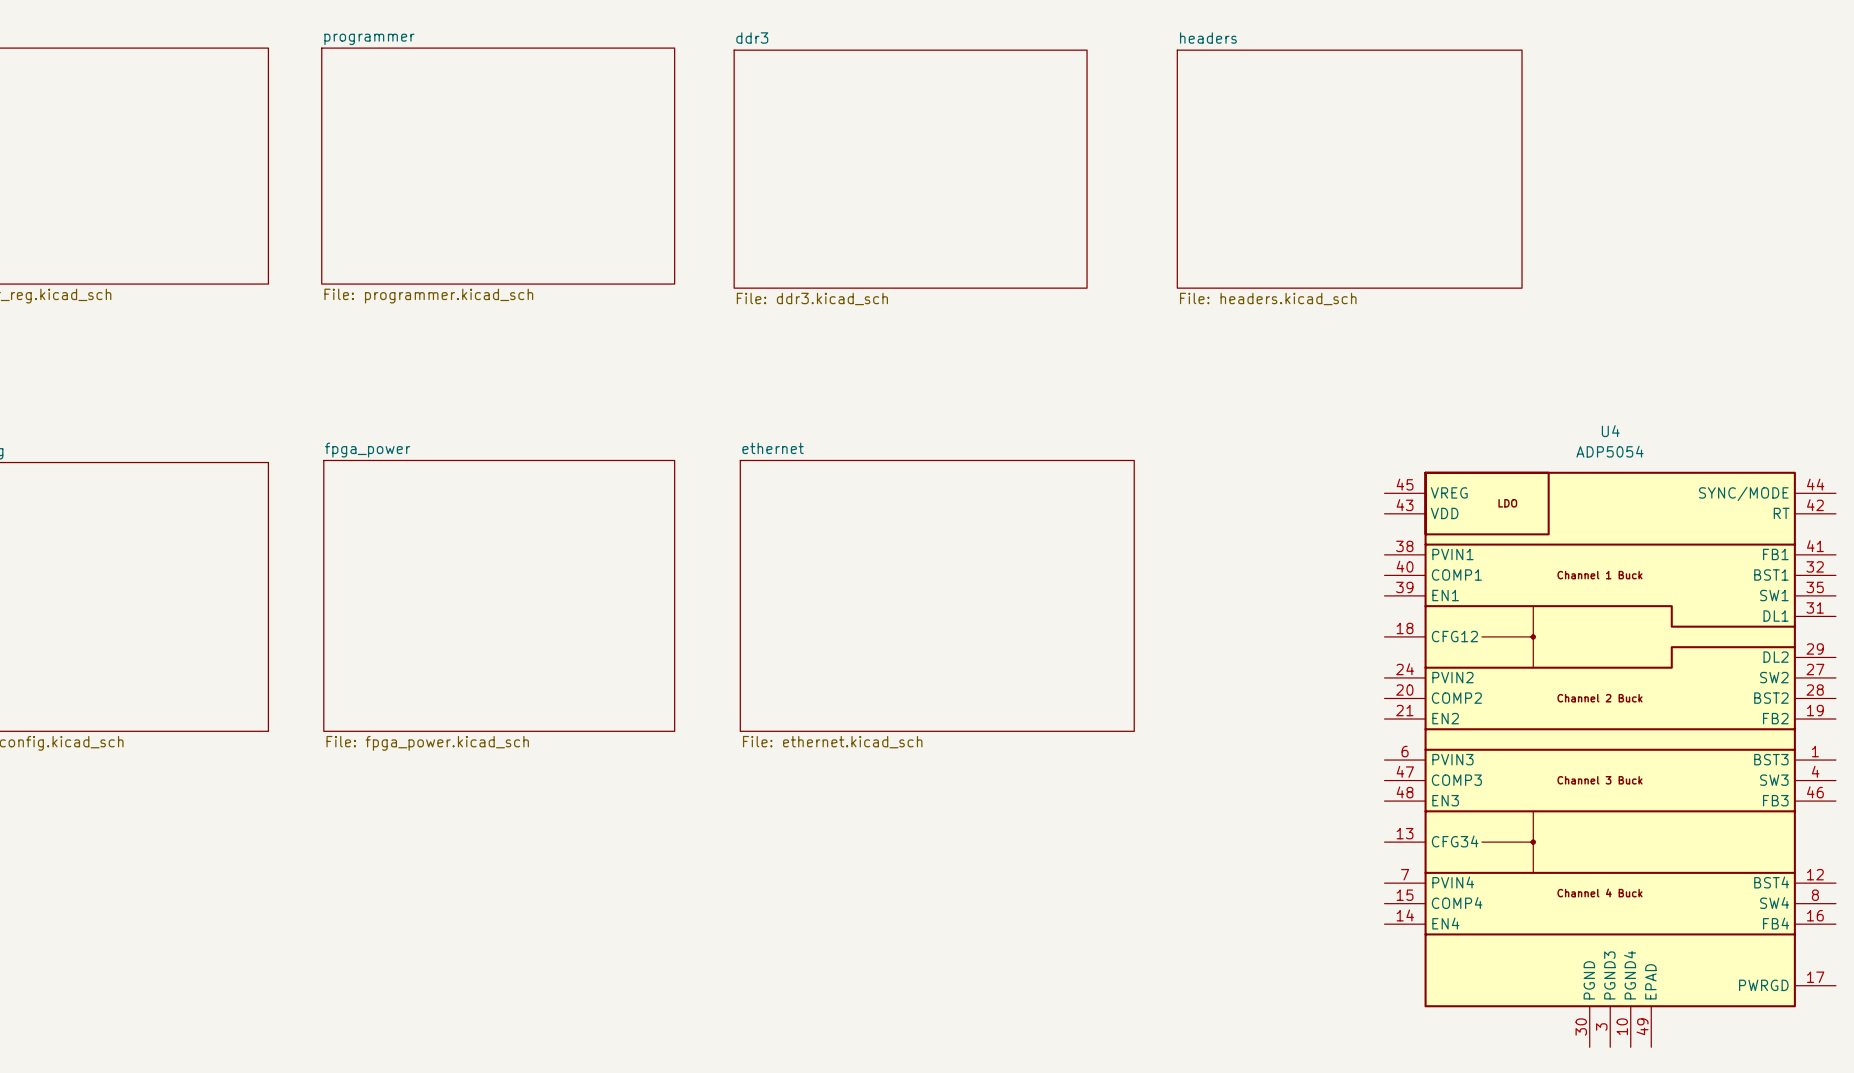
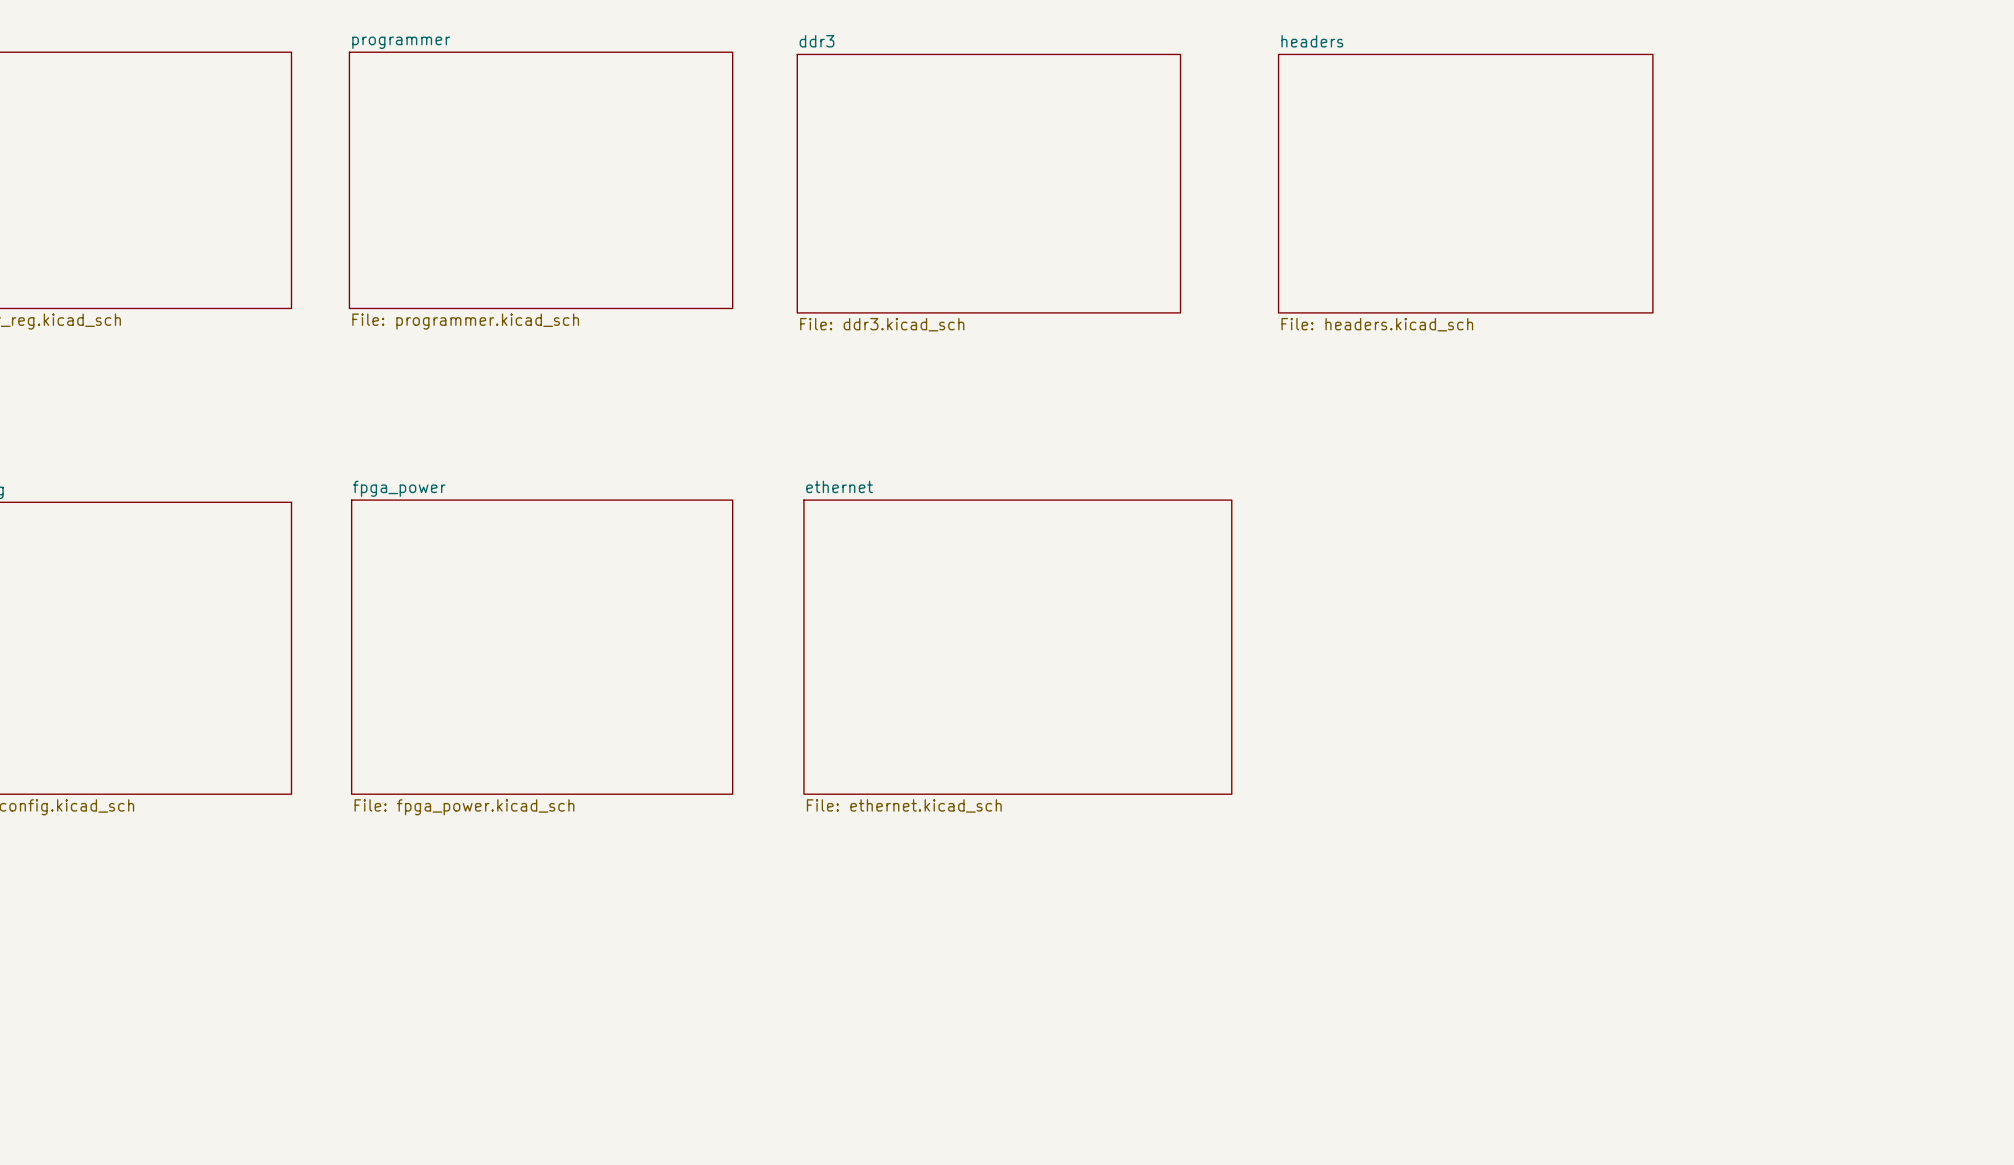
U4: ADP5054 (1610, 759) -> none

